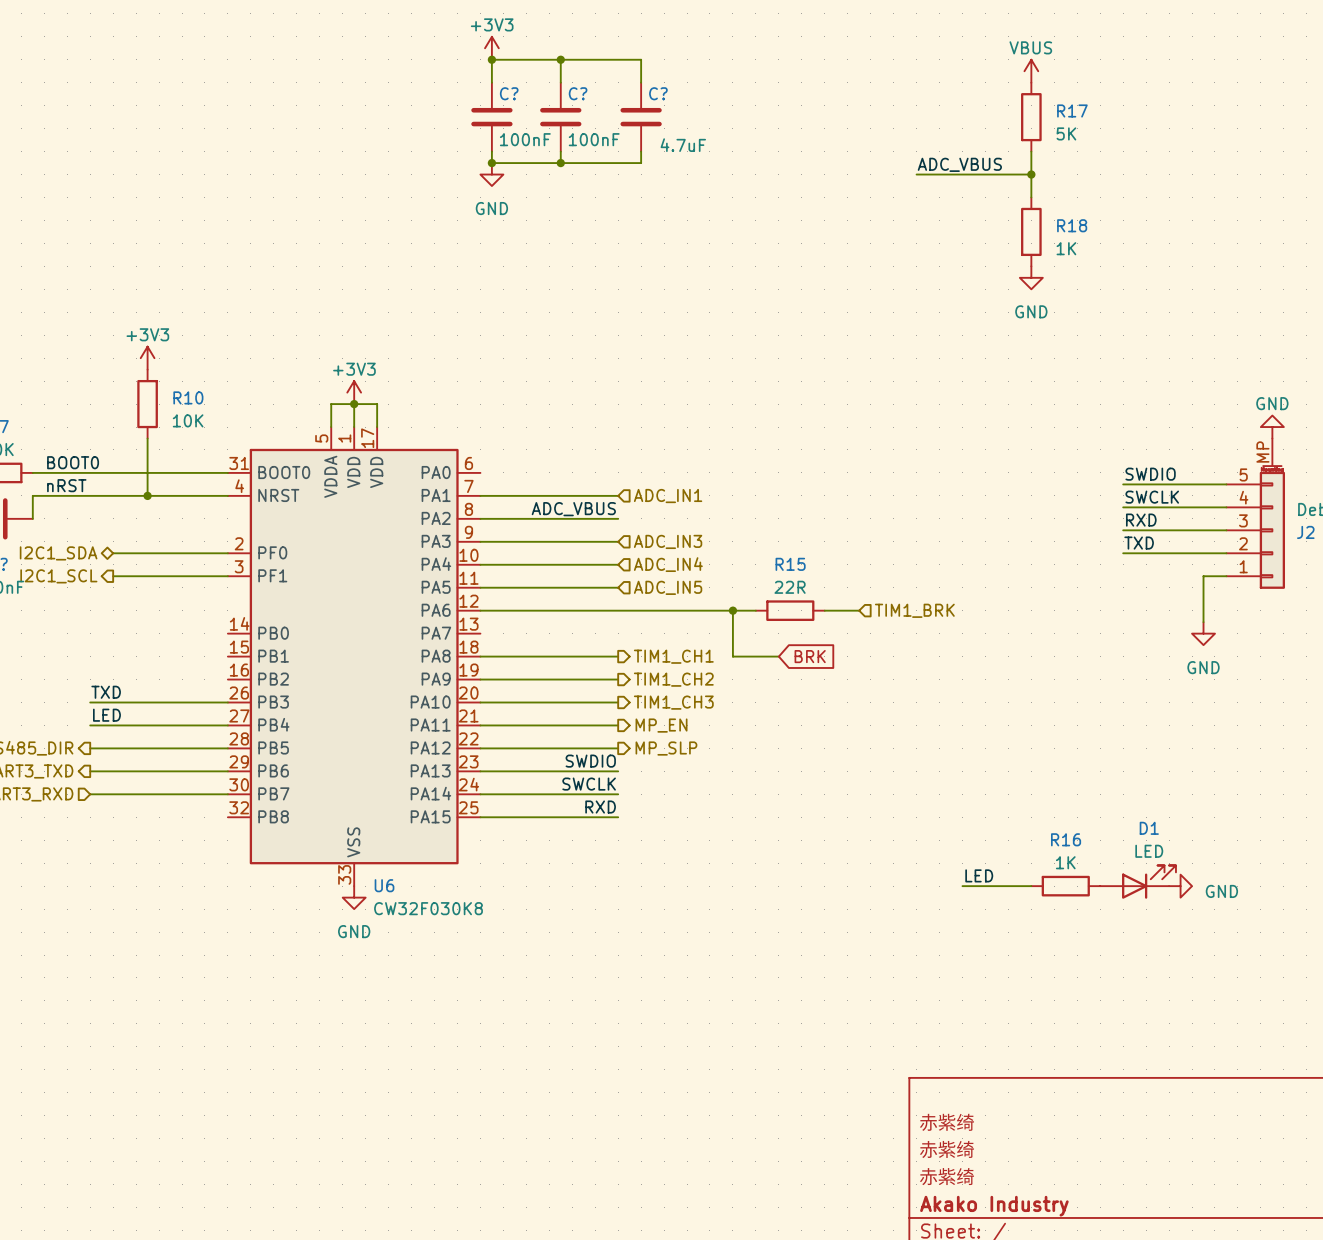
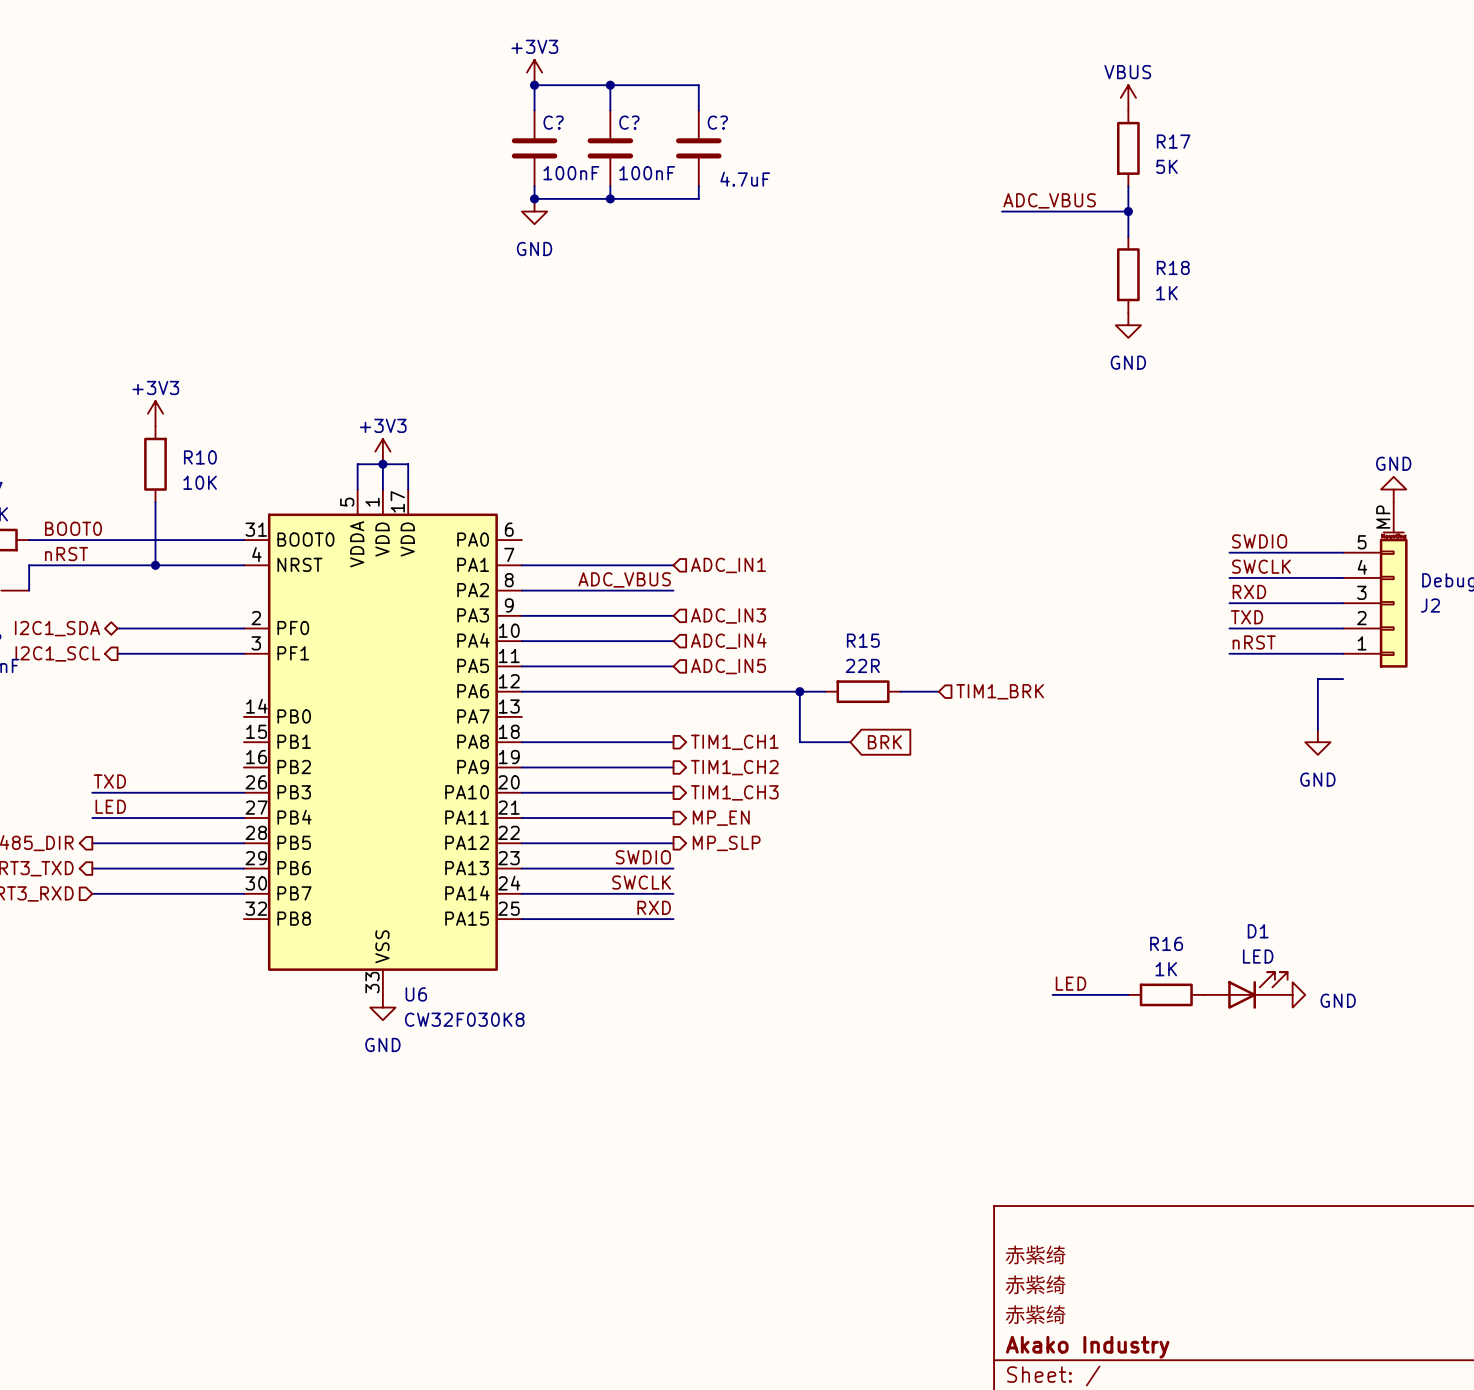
label: none -> nRST (1254, 642)
wire: none -> (1229, 653) (1317, 653)
wire: (1203, 576) (1203, 599) -> (1343, 679) (1317, 679)
power symbol position: GND (1203, 633) -> GND (1317, 742)

